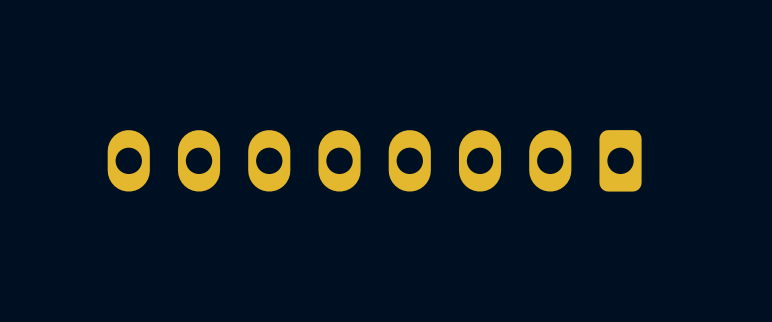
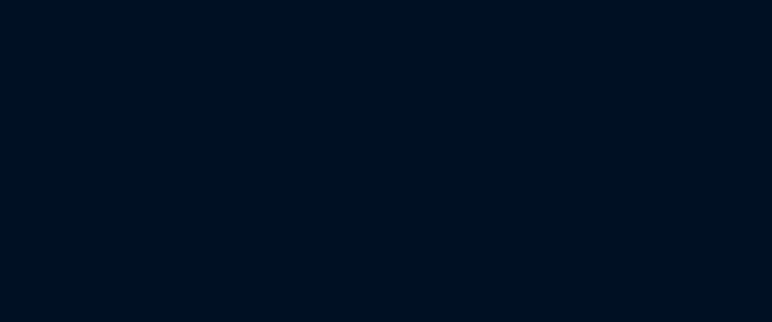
part: (374, 160) -> none

